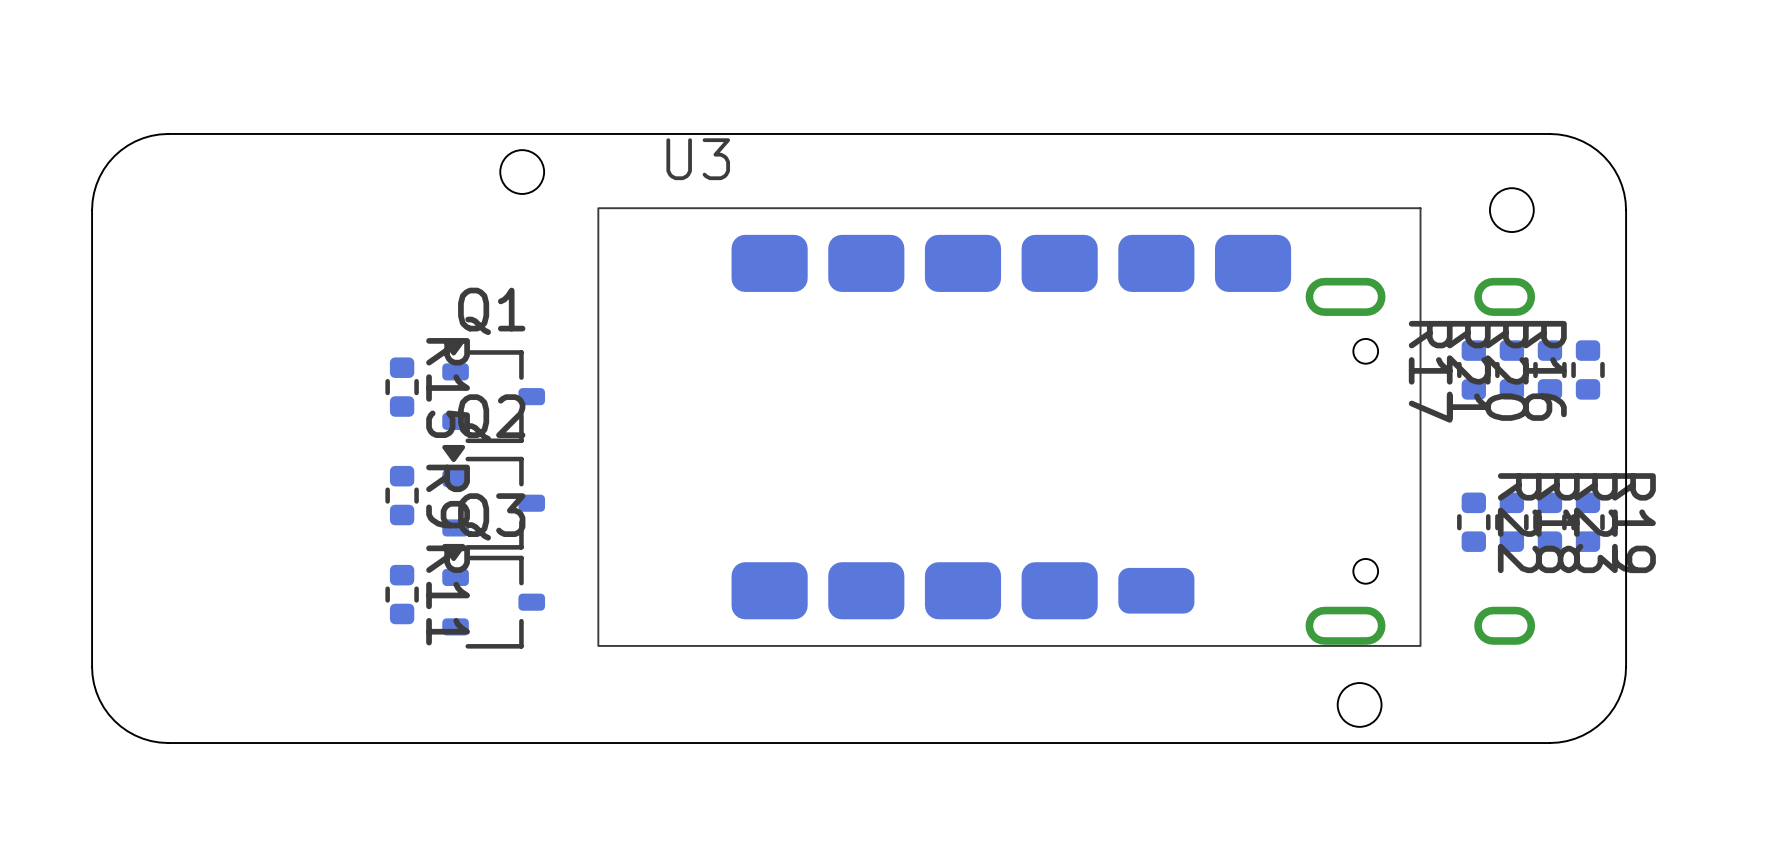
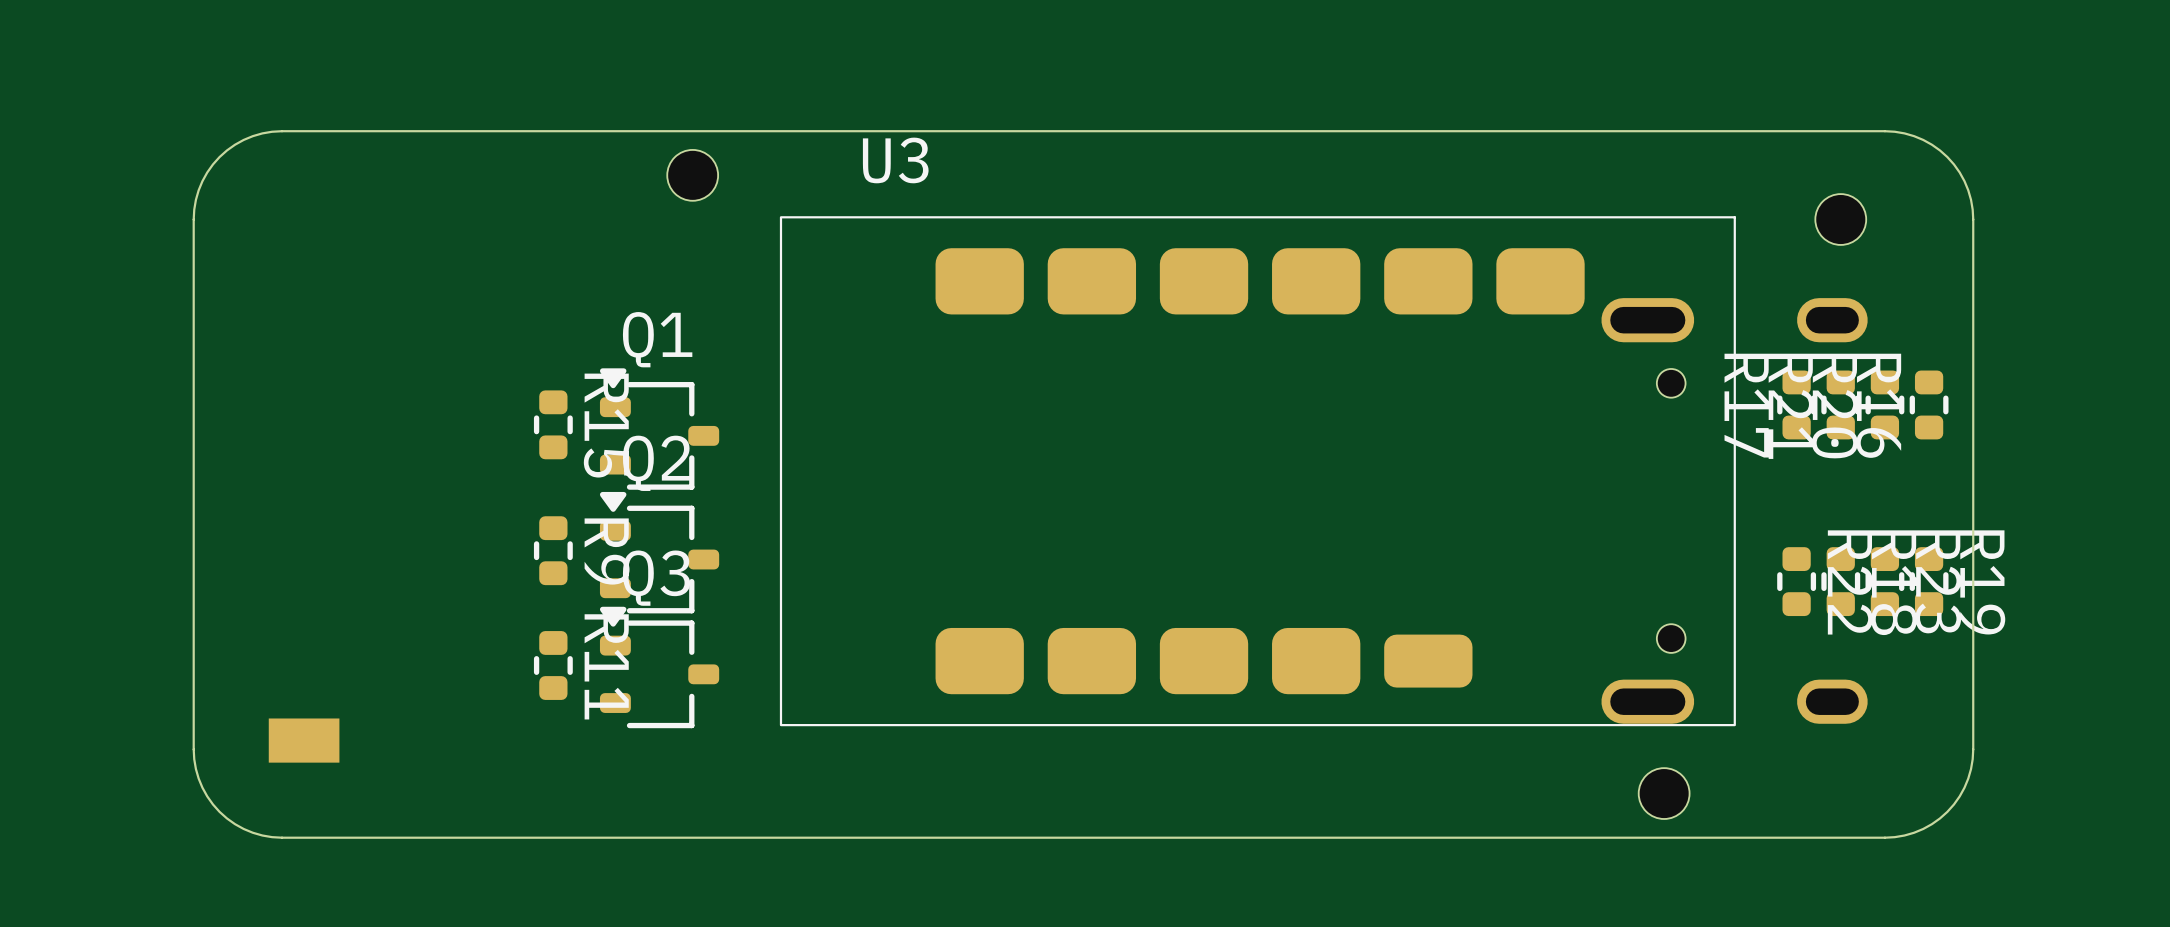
part: none -> (304, 740)

